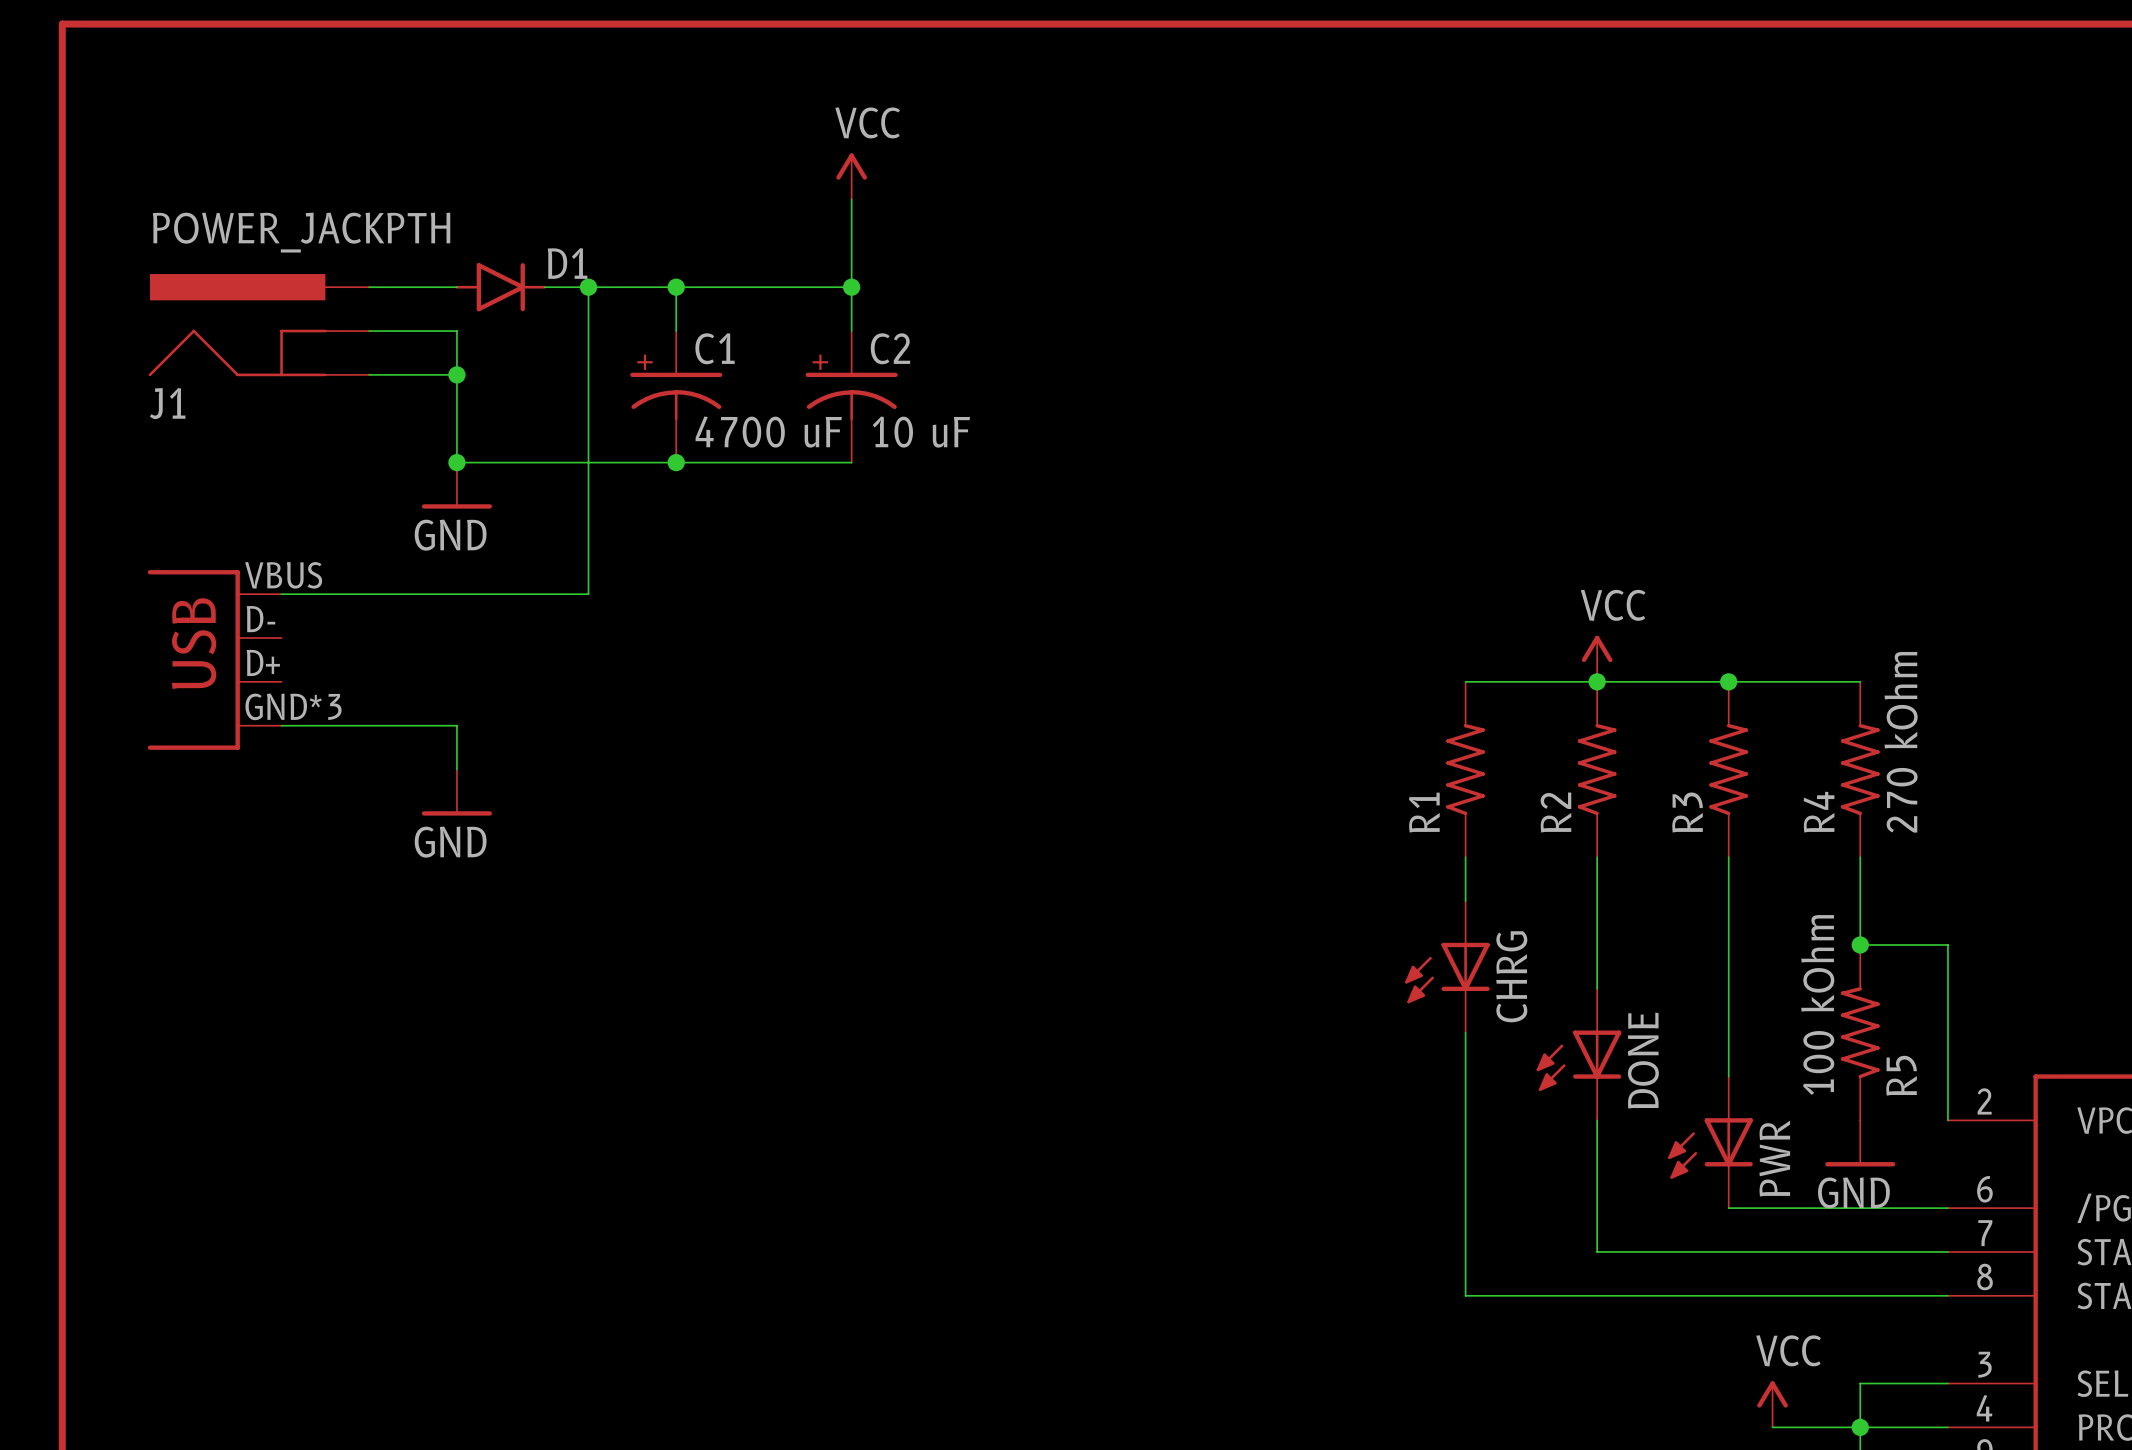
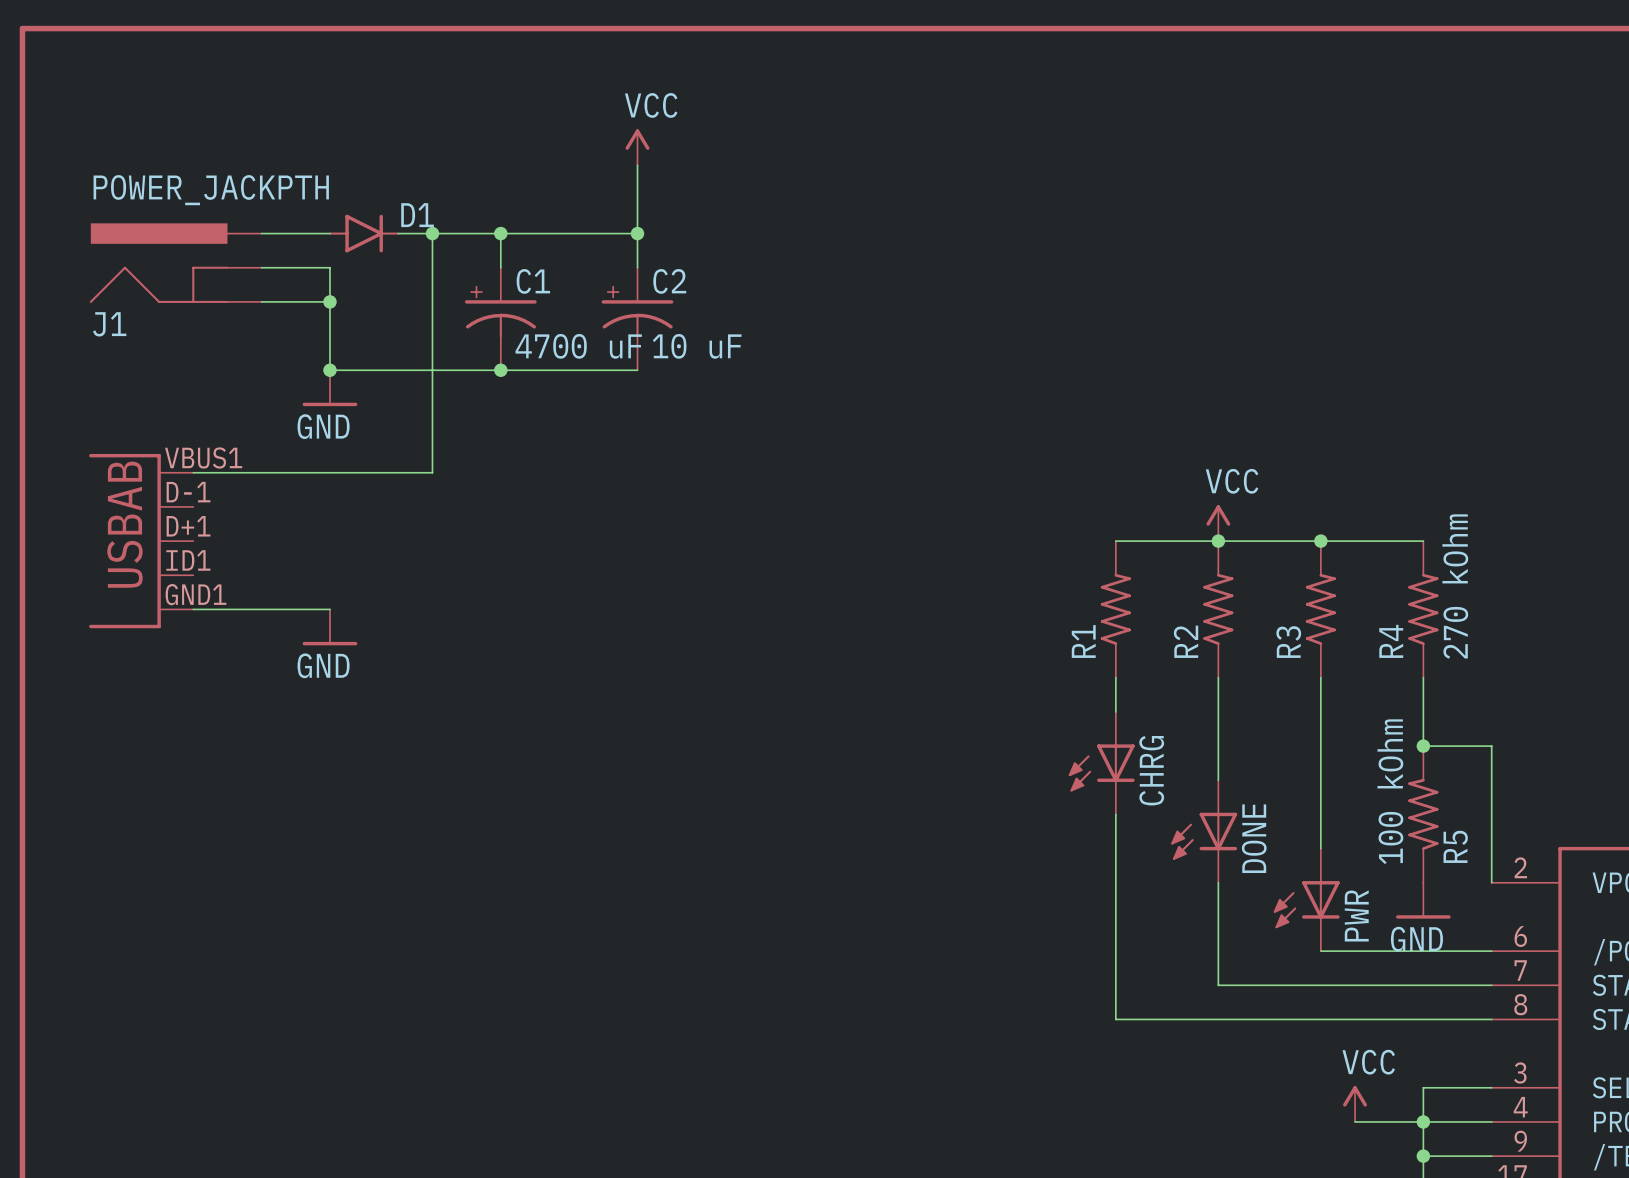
part: (214, 659) -> none
part: none -> (141, 541)
wire: (281, 725) (456, 725) (456, 769) -> (193, 609) (329, 609)

